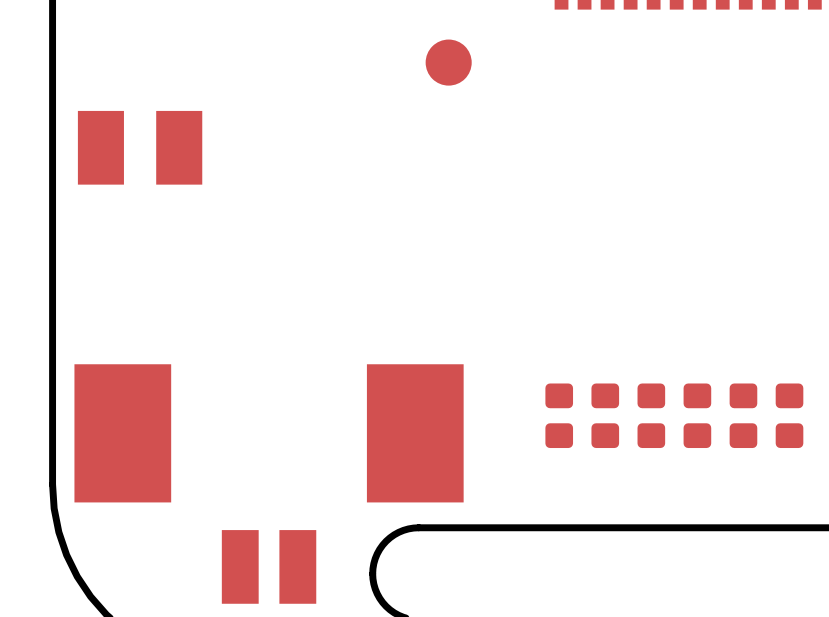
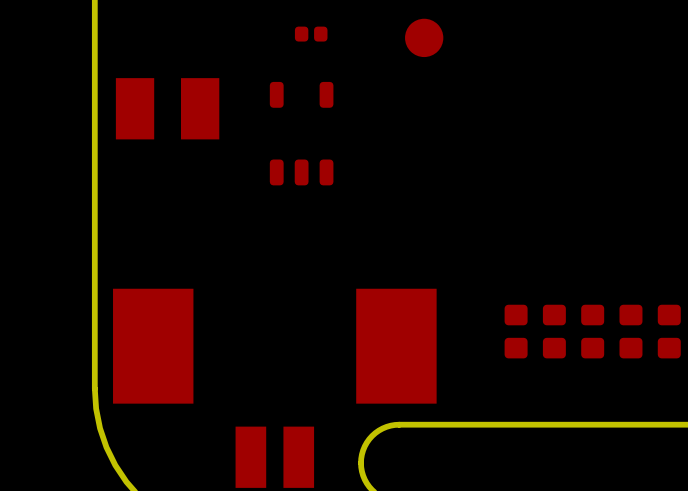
part: none -> (311, 34)
part: none -> (301, 133)

